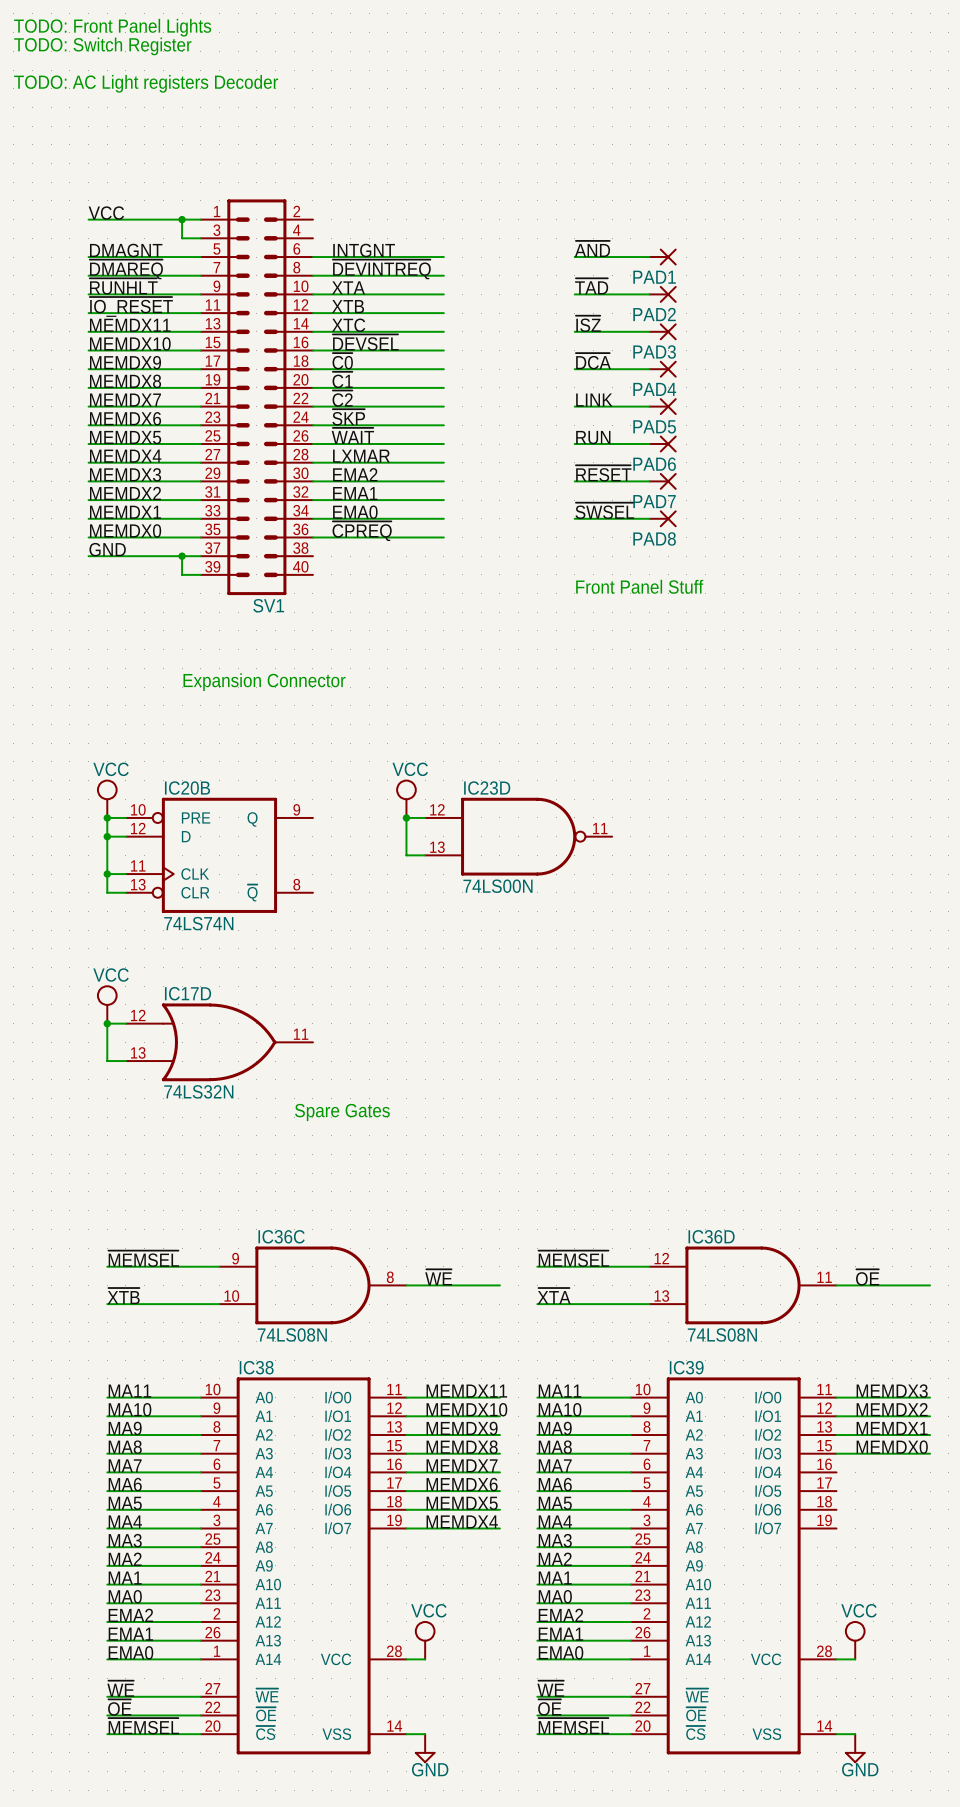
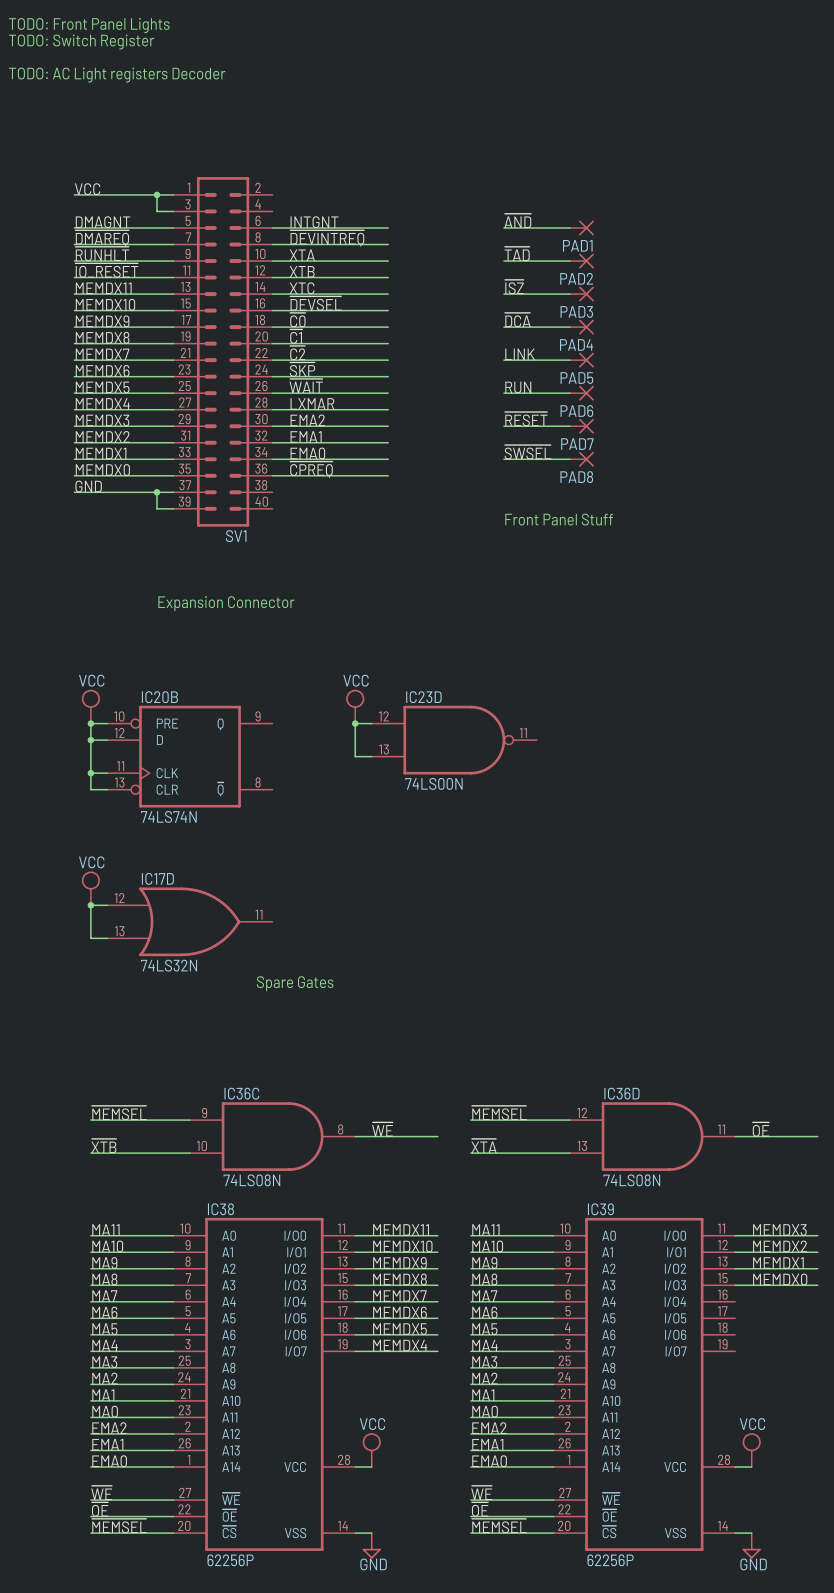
IC38 value: none -> 62256P (230, 1560)
IC39 value: none -> 62256P (610, 1560)

